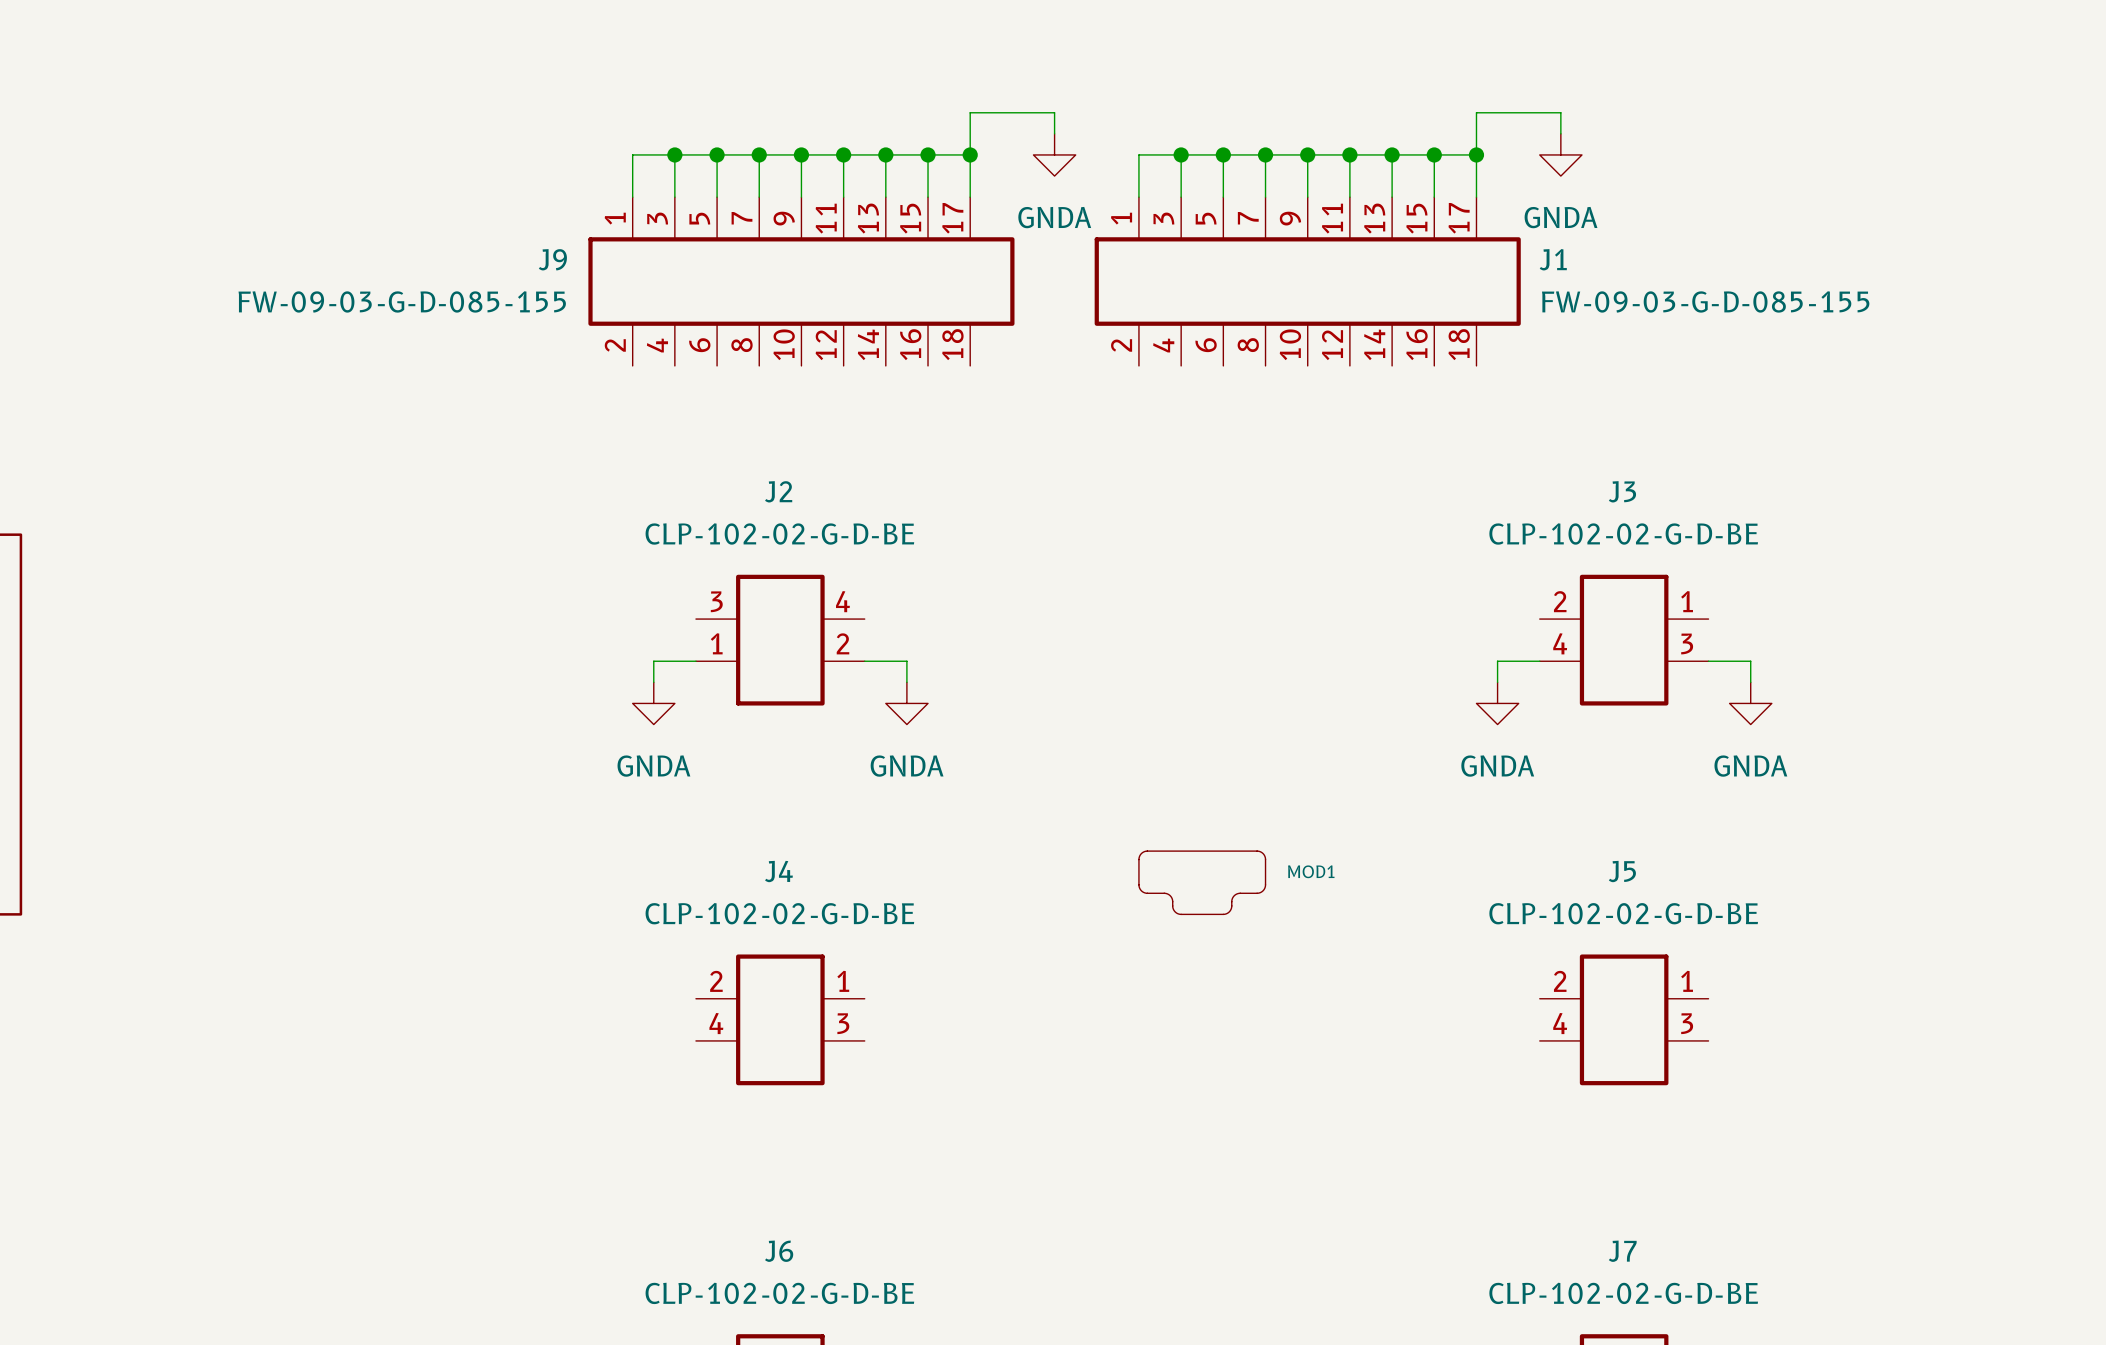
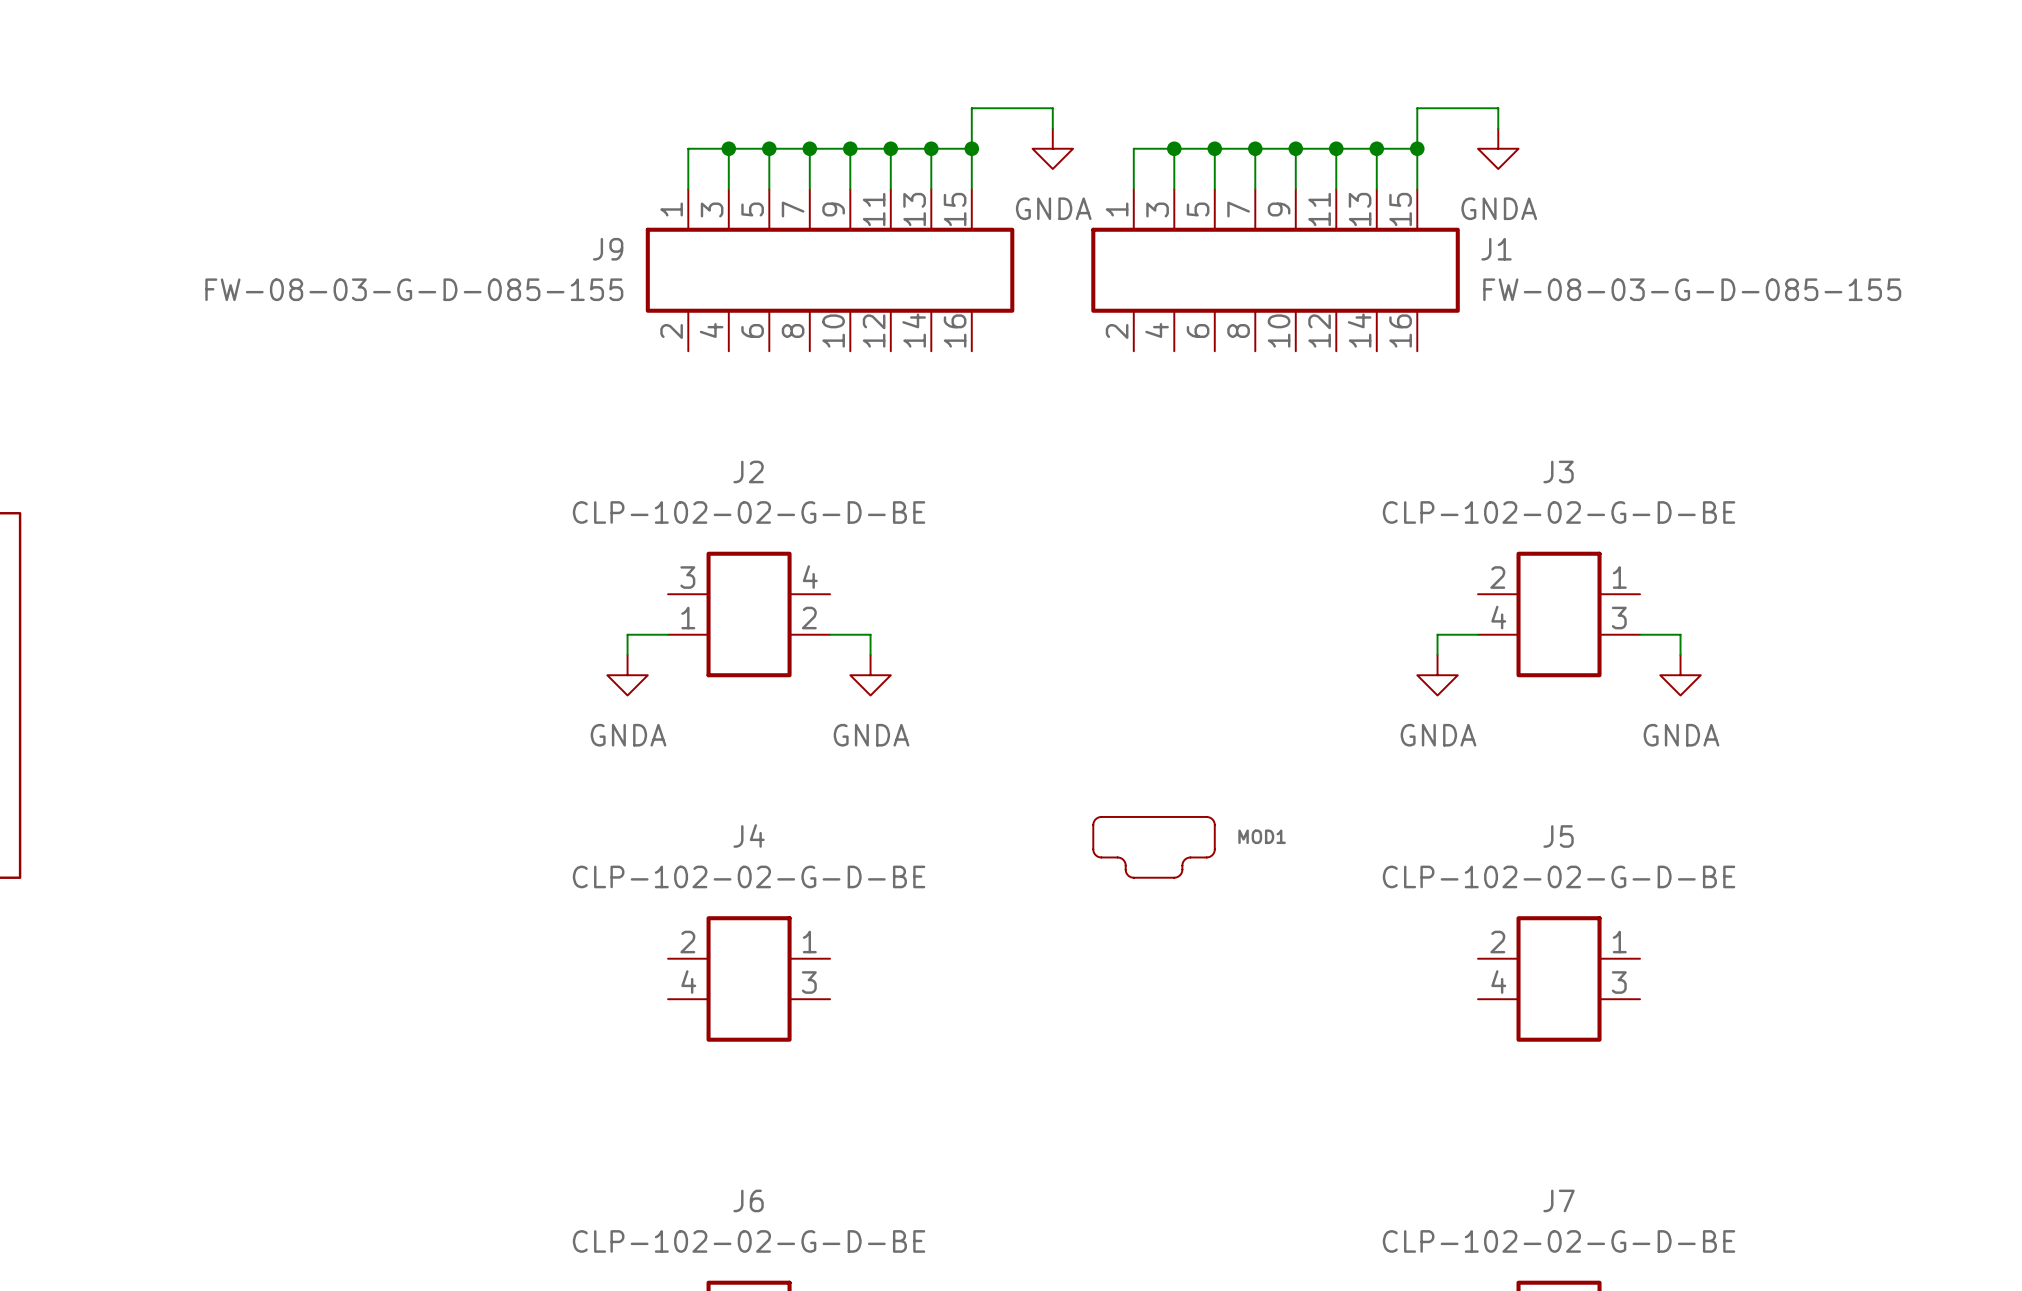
wire: (1012, 112) (970, 112) (970, 154) -> (971, 148) (931, 148)
wire: none -> (971, 108) (971, 189)
wire: (1054, 112) (1054, 133) -> (1012, 108) (1052, 108) (1052, 128)
wire: (674, 154) (674, 197) -> none
junction: (674, 154) -> none
wire: (717, 154) (632, 154) (632, 197) -> none
junction: (717, 154) -> none
junction: none -> (971, 148)
power symbol position: GNDA (1054, 154) -> GNDA (1052, 148)
wire: (1181, 154) (1138, 154) (1138, 197) -> none
junction: (1181, 154) -> none
J9 symbol: [588, 197, 1015, 366] -> [645, 189, 1015, 352]
J1 symbol: [1094, 197, 1521, 366] -> [1091, 189, 1460, 352]
J9 value: FW-09-03-G-D-085-155 (402, 301) -> FW-08-03-G-D-085-155 (414, 289)
J1 value: FW-09-03-G-D-085-155 (1705, 301) -> FW-08-03-G-D-085-155 (1692, 289)

